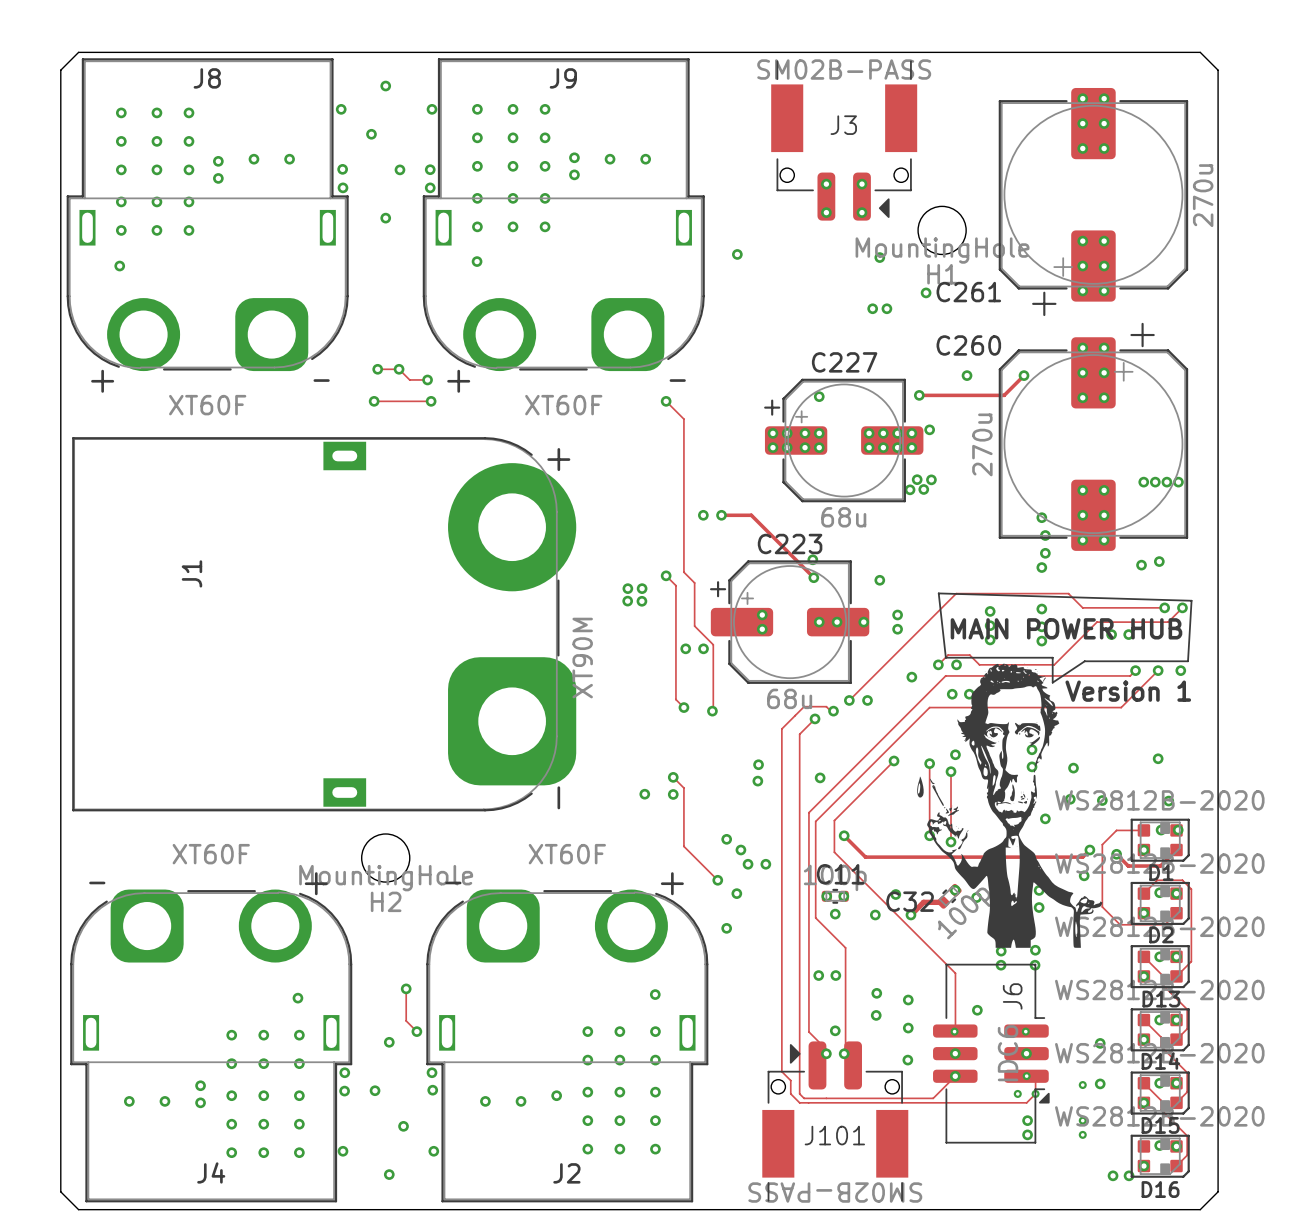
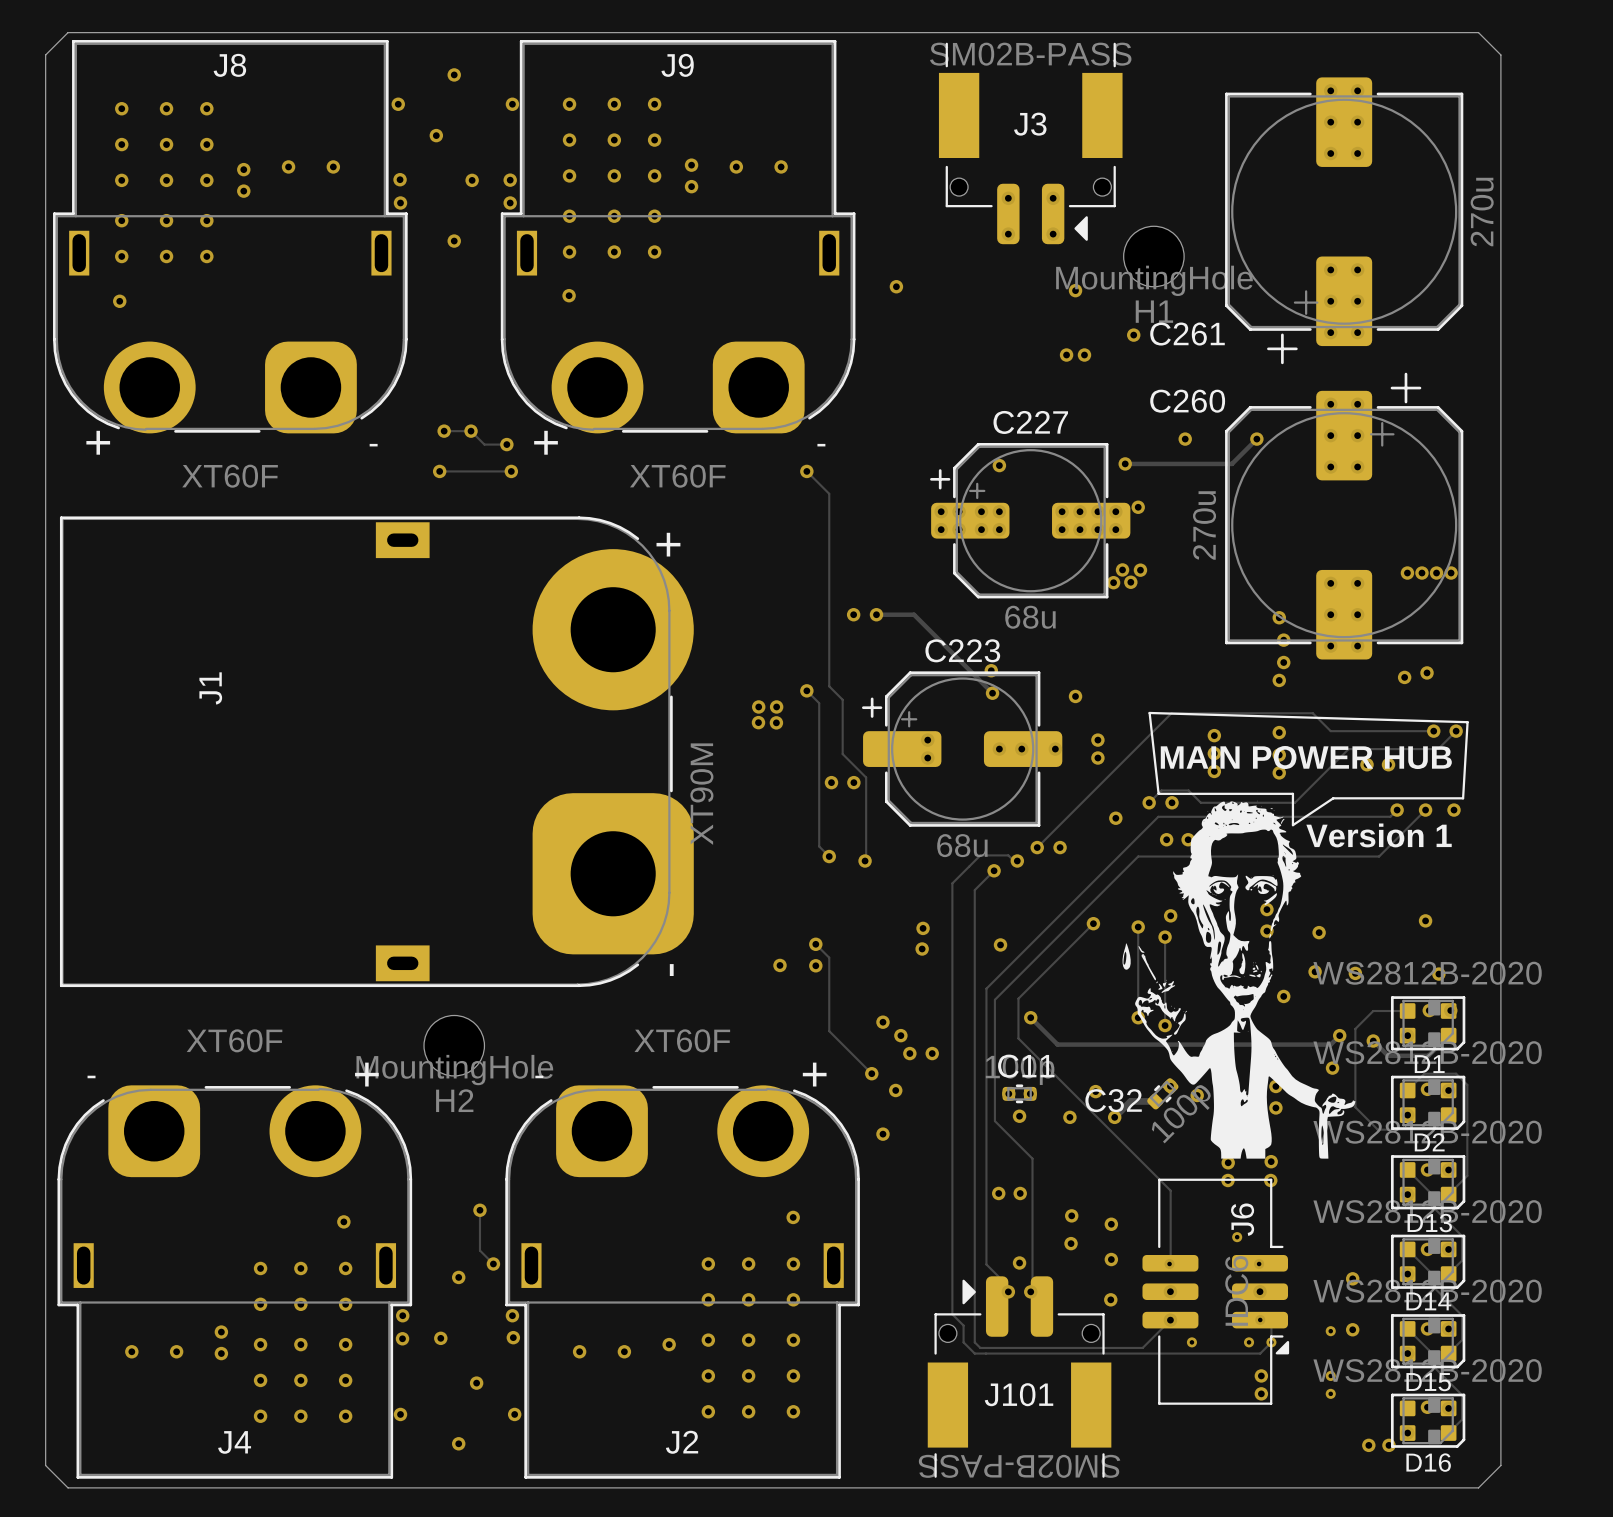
via: (977, 1010) -> none
via: none -> (1237, 1237)
via: none -> (1191, 1342)

